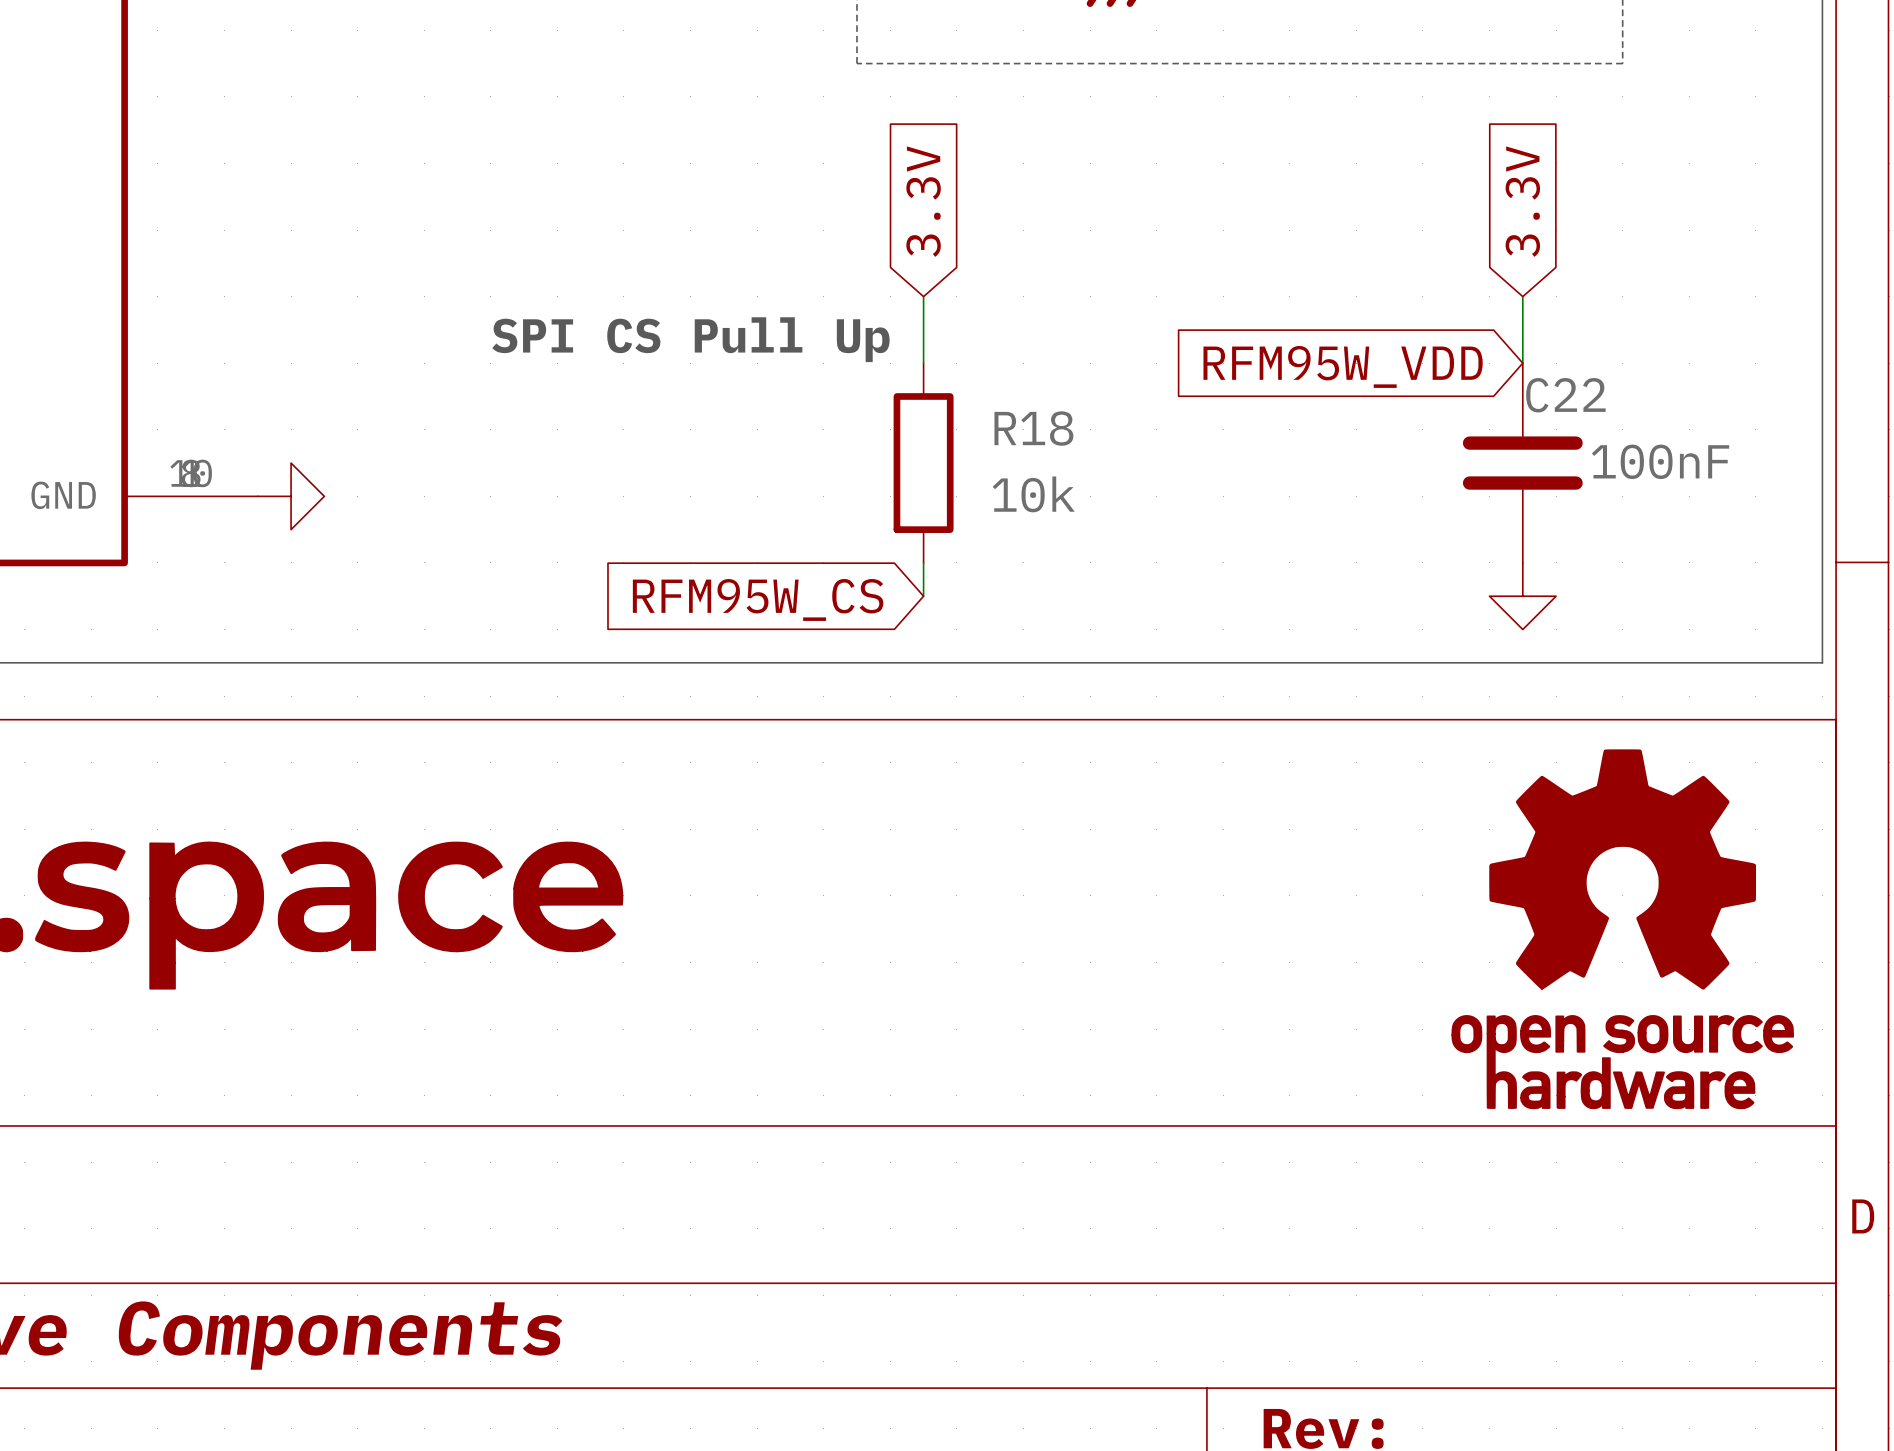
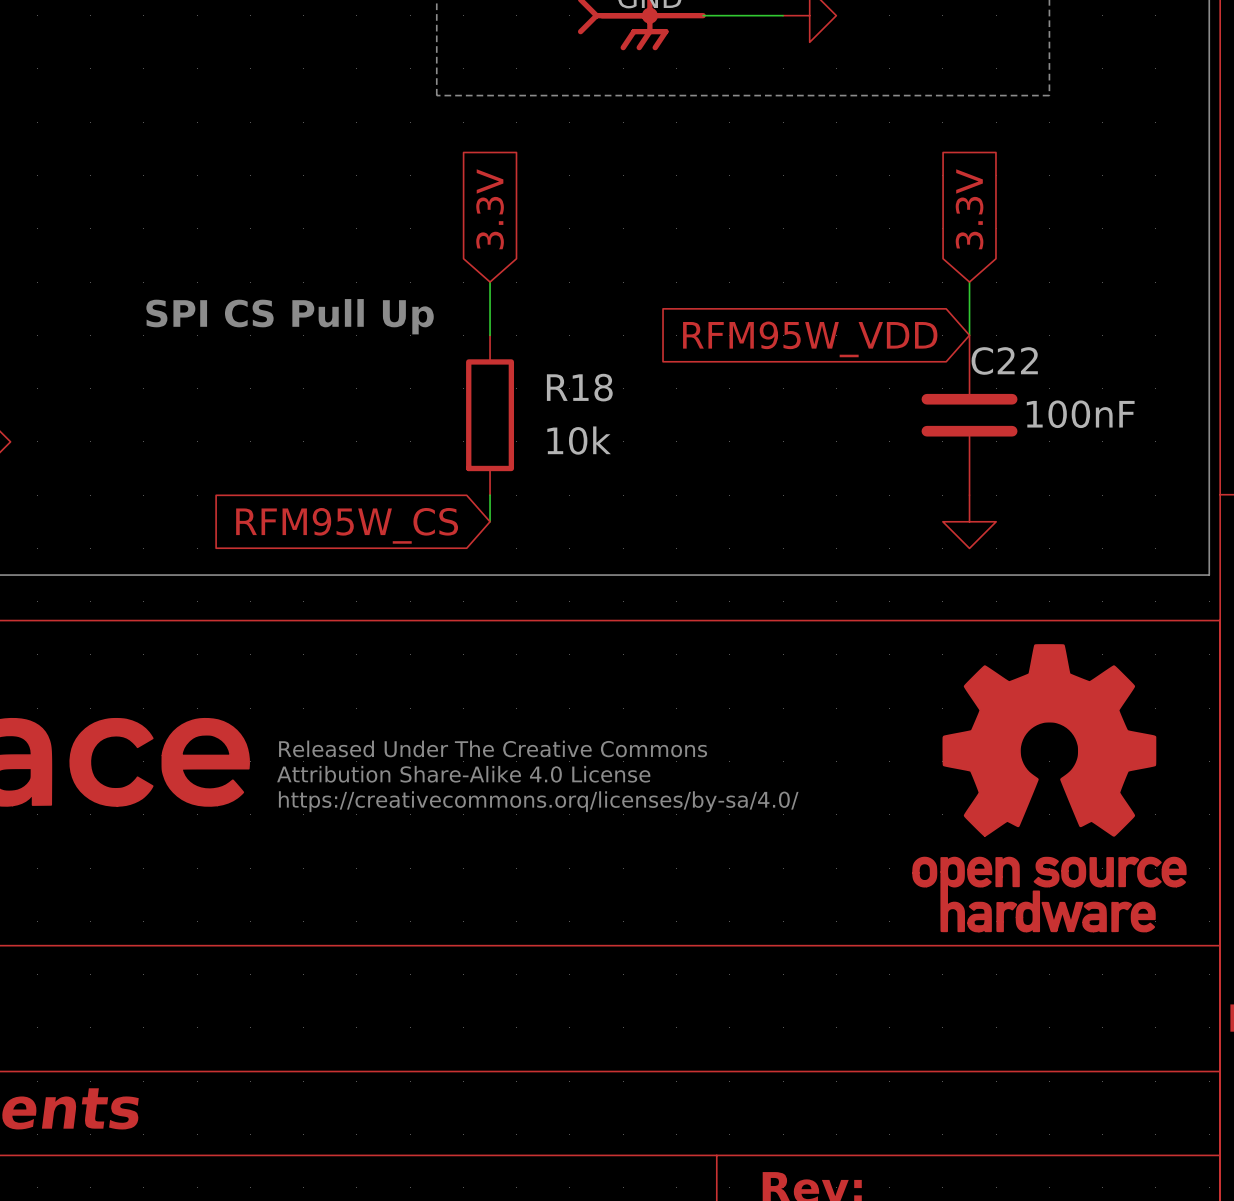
text: none -> Released Under The Creative Commons (493, 748)
text: none -> Attribution Share-Alike 4.0 License (463, 774)
text: none -> https://creativecommons.orq/licenses/by-sa/4.0/ (538, 801)

